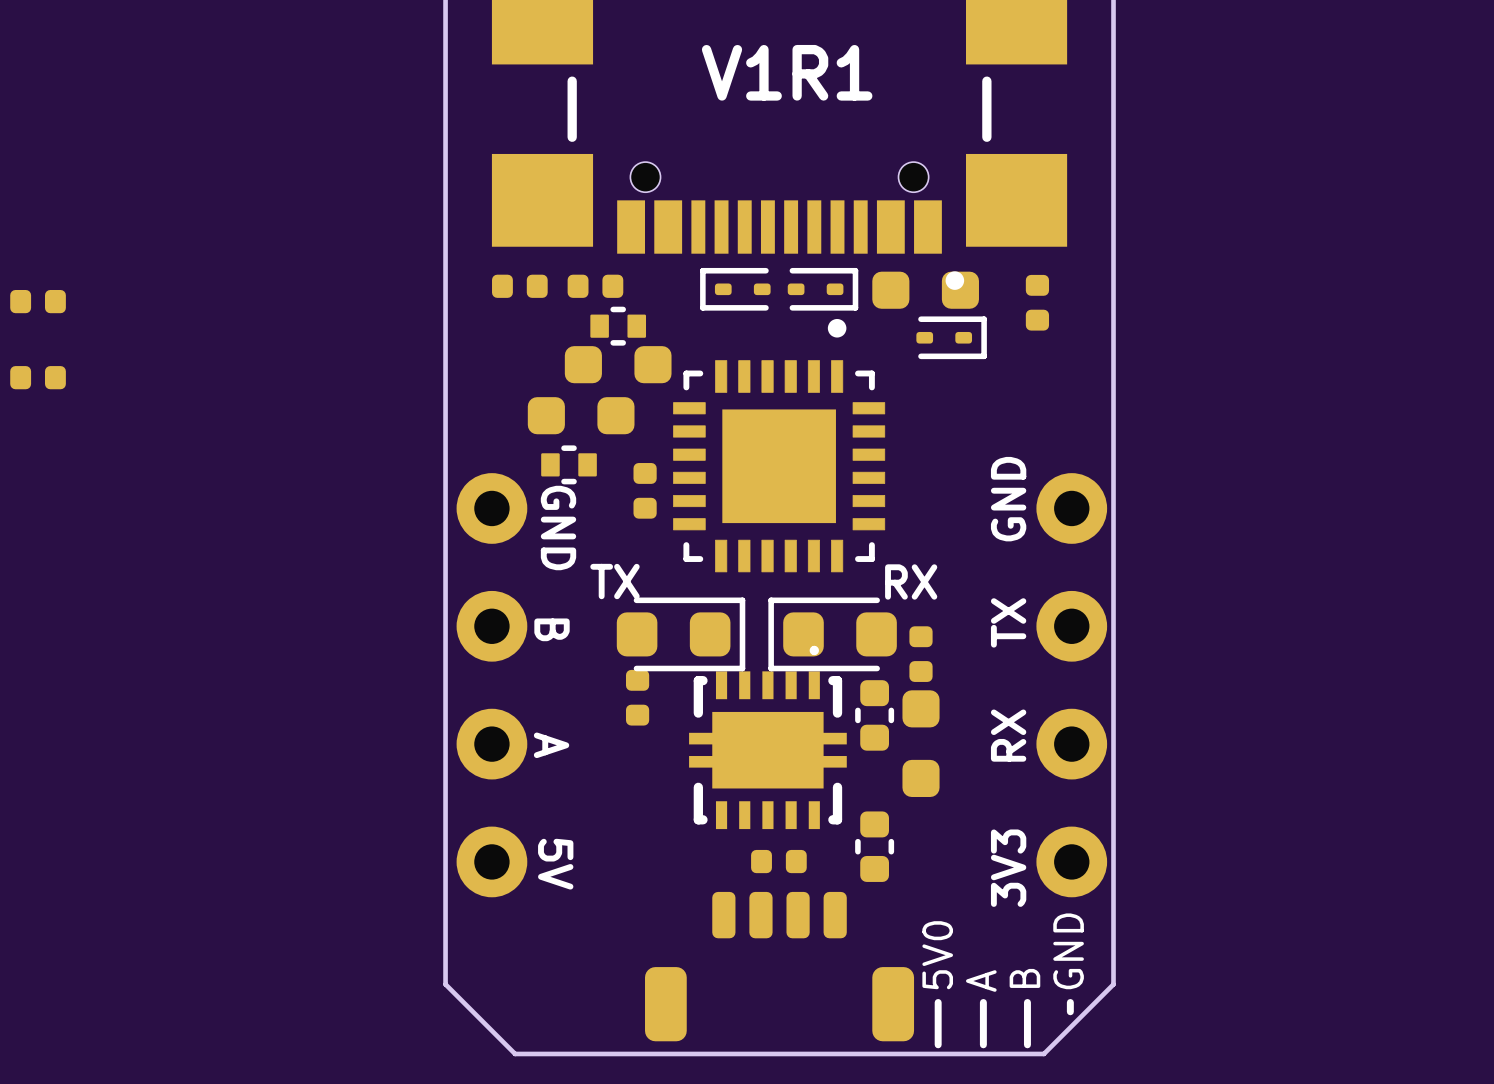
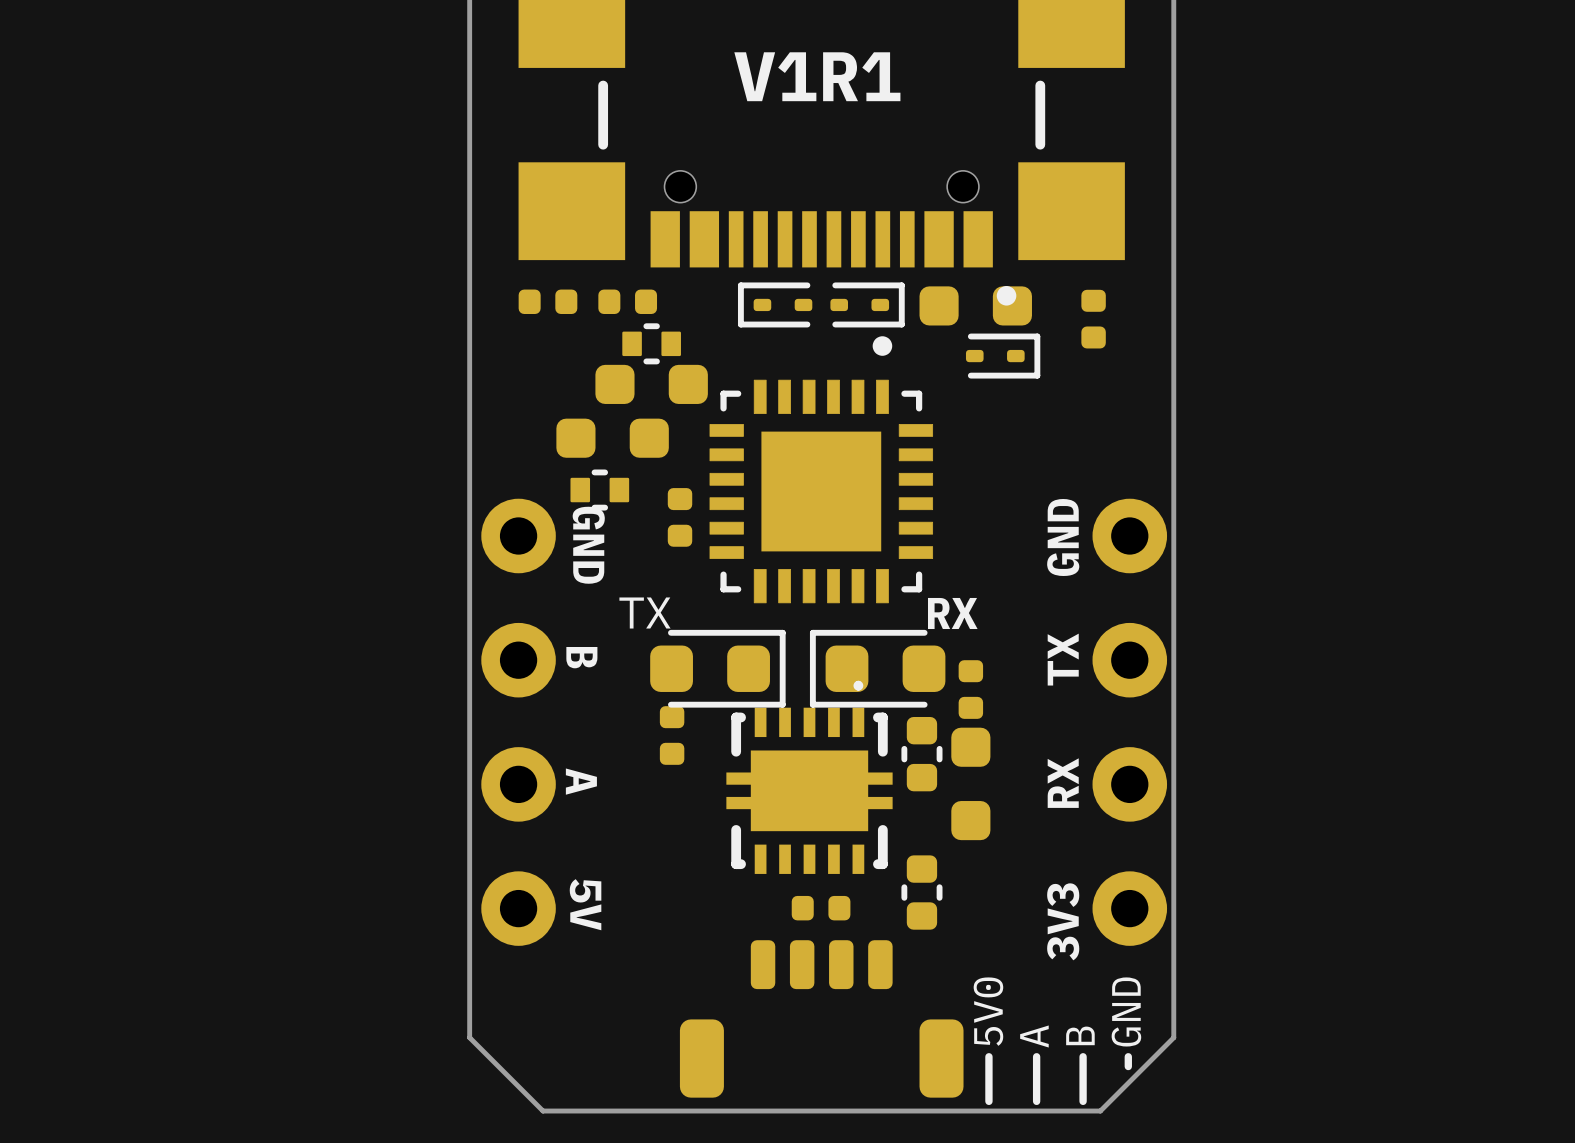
part: (38, 301) -> none
part: (38, 377) -> none

